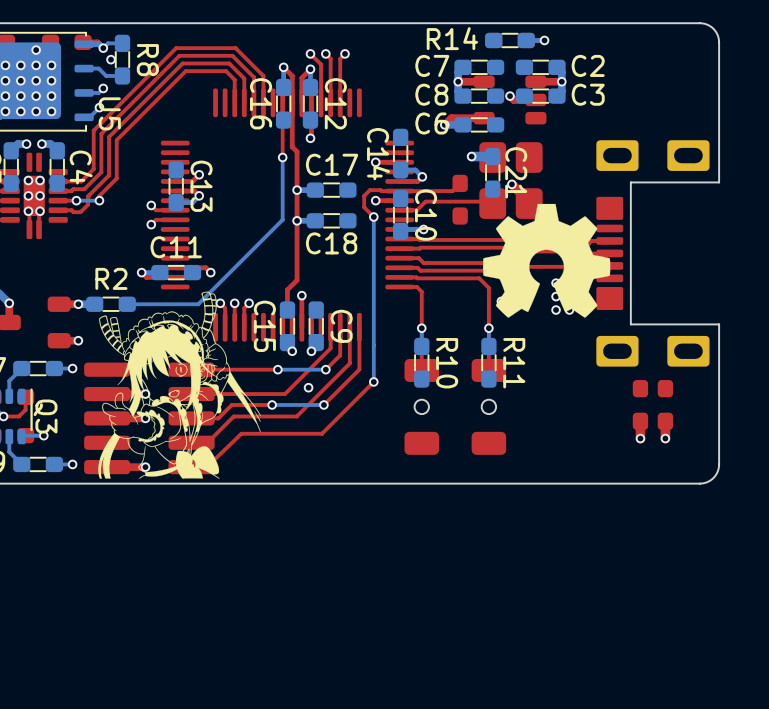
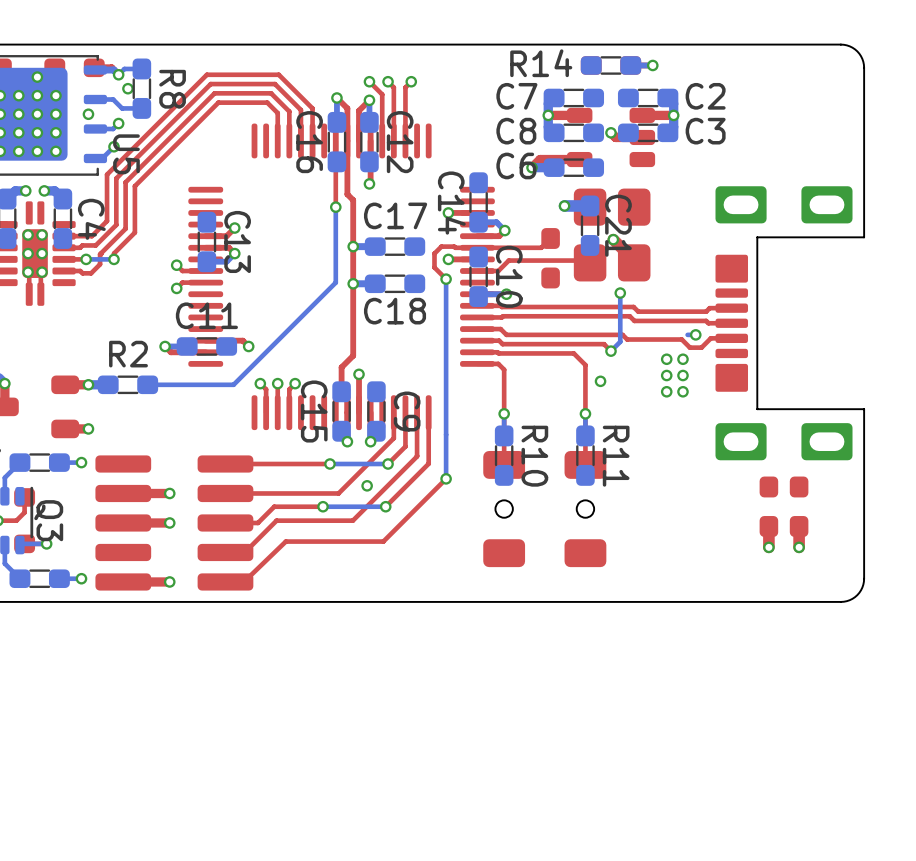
via: none -> (88, 114)
drawing: [483, 203, 611, 318] -> none
drawing: [98, 291, 261, 479] -> none

